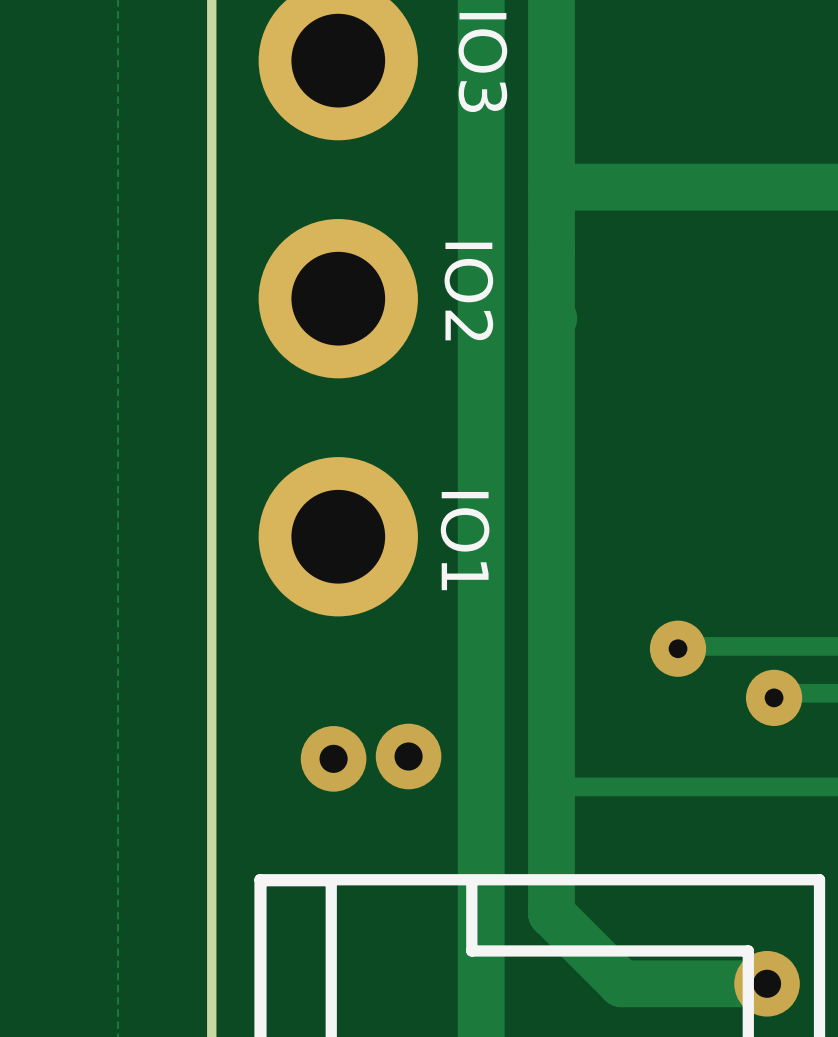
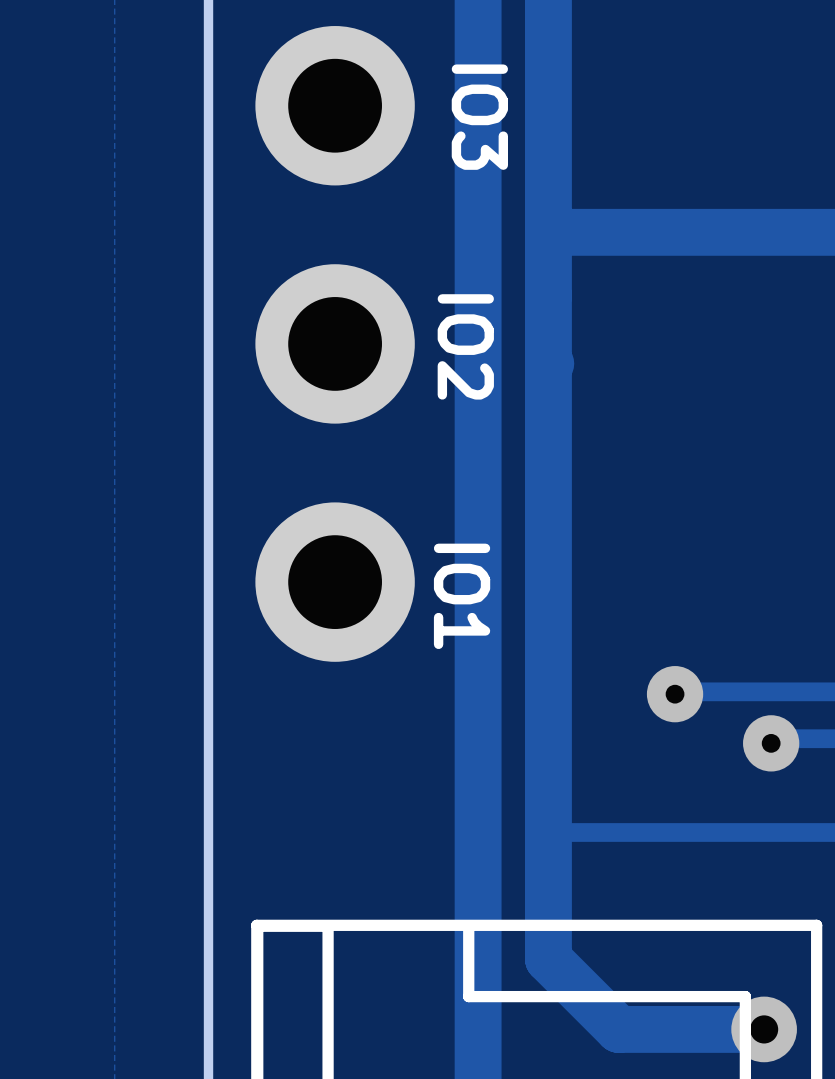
via: (408, 756) -> none
via: (333, 758) -> none

